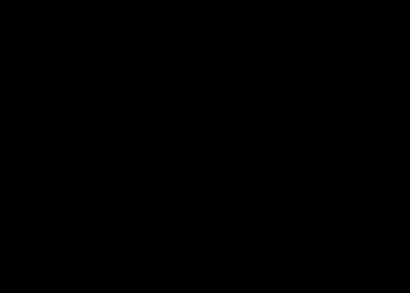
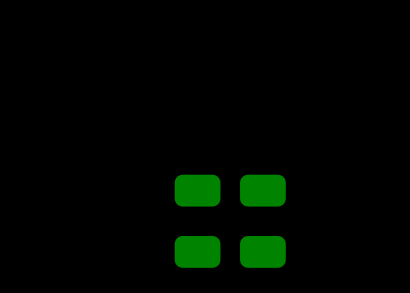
part: none -> (197, 221)
part: none -> (262, 221)

